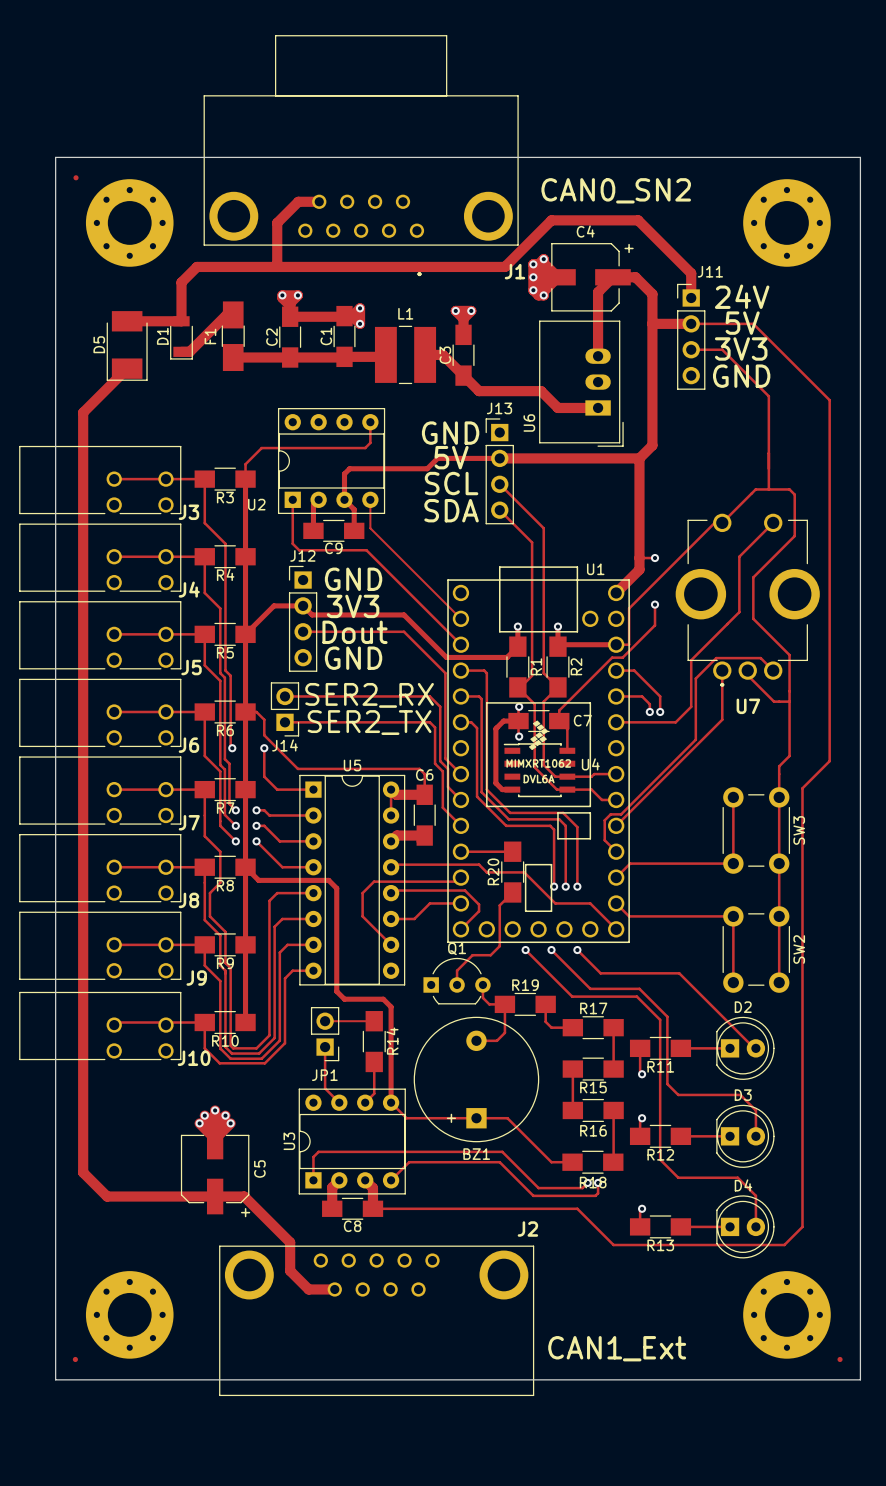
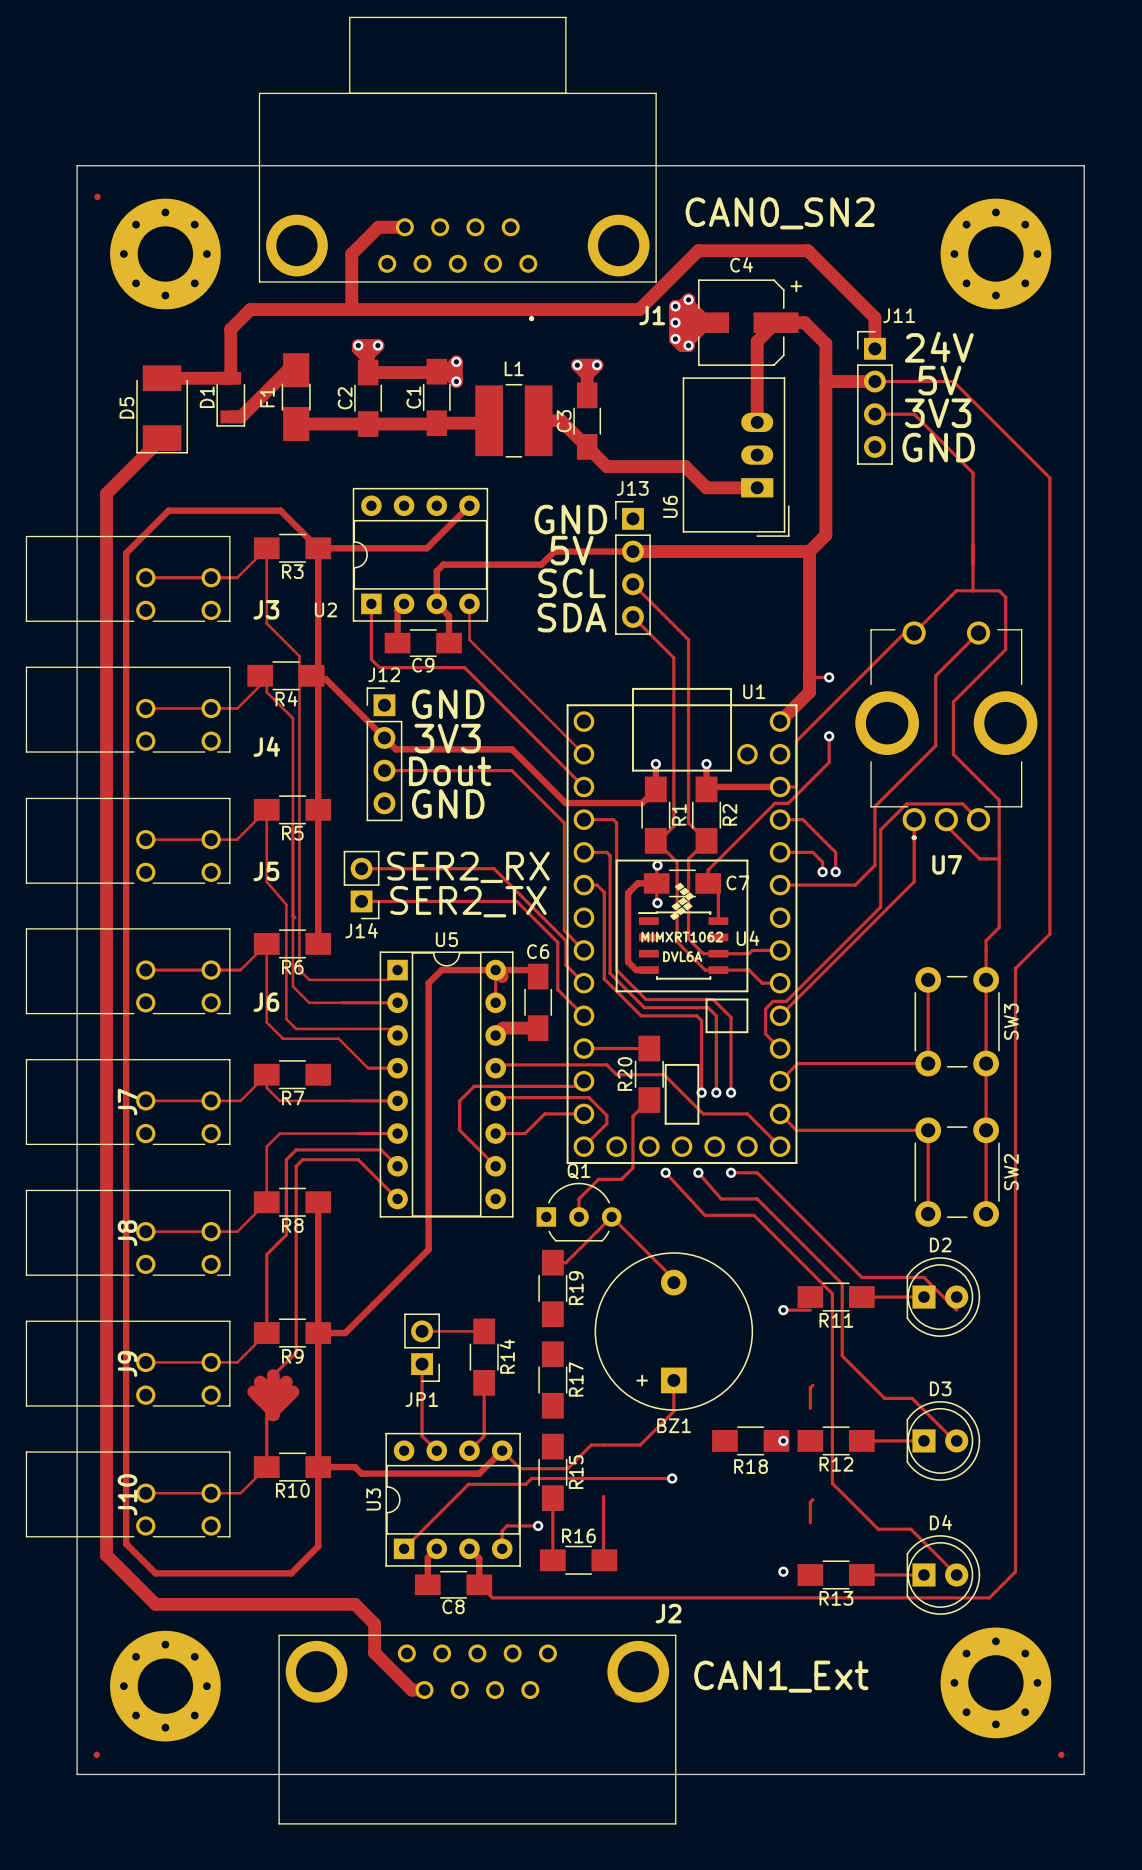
board edge: (55, 157) (55, 1379) (860, 1379) (860, 157) (55, 157) -> (77, 165) (77, 1774) (1084, 1774) (1084, 165) (77, 165)
track: (370, 422) (370, 442) (365, 448) (261, 448) (245, 464) (245, 1022) -> (469, 505) (426, 548) (318, 548)
track: none -> (318, 548) (318, 943)
track: none -> (318, 548) (280, 510) (168, 510) (126, 553) (126, 1543) (155, 1573) (291, 1573) (318, 1546) (318, 1202)
track: (186, 479) (204, 479) (204, 523) (225, 543) (225, 670) (230, 675) -> (145, 708) (237, 708) (266, 679) (266, 692) (292, 718) (292, 826)
R3 position: (225, 479) -> (292, 548)
J3 name position: J3 (188, 512) -> J3 (266, 609)
track: (114, 556) (204, 556) (204, 592) (220, 608) (220, 673) (224, 677) (224, 759) (229, 763) (229, 803) (235, 810) -> none
J4 position: (100, 557) -> (128, 709)
J4 name position: J4 (189, 589) -> J4 (266, 746)
track: (303, 605) (273, 605) (245, 634) -> (384, 737) (325, 679) (318, 679) (318, 548)
track: (114, 634) (204, 634) (204, 665) (220, 680) (220, 765) (224, 769) (224, 814) (235, 825) -> none
R5 position: (225, 634) -> (292, 809)
J5 position: (100, 635) -> (128, 840)
J5 name position: J5 (191, 667) -> J5 (266, 871)
text position: SER2_RX (369, 695) -> SER2_RX (468, 867)
track: (284, 696) (429, 696) (440, 706) (440, 761) (448, 768) (448, 787) -> (361, 868) (493, 868) (565, 940) (565, 965) (567, 966)
J14 position: (284, 709) -> (361, 885)
track: (114, 711) (204, 711) (204, 755) (220, 771) (220, 825) (235, 841) -> none
R6 position: (225, 711) -> (292, 943)
track: (245, 711) (256, 711) (264, 719) (264, 735) (297, 768) (419, 768) (424, 774) (424, 794) (396, 794) -> none
J6: (100, 712) -> none
track: (284, 722) (429, 722) (435, 727) (435, 763) (442, 771) (442, 807) -> (361, 901) (516, 901) (557, 942) (557, 989) (561, 992)
text position: SER2_TX (369, 722) -> SER2_TX (468, 901)
via: (232, 748) -> none
track: (264, 748) (264, 776) (277, 789) (313, 789) -> (237, 577) (266, 548) (266, 623) (299, 656) (299, 970) (309, 979) (387, 979) (397, 970)
via: (264, 748) -> none
track: (189, 789) (204, 789) (204, 836) (220, 851) (220, 882) (209, 893) (209, 916) (225, 931) (225, 939) -> none
R7 position: (225, 789) -> (292, 1074)
track: none -> (531, 970) (441, 970) (428, 983) (428, 1249) (345, 1333) (318, 1333)
via: (235, 810) -> none
track: (256, 810) (264, 810) (269, 815) -> (292, 915) (292, 986) (309, 1002) (341, 1002)
via: (256, 810) -> none
J7 name: J7 (189, 822) -> J6 (266, 1002)
via: (235, 825) -> none
track: (256, 825) (264, 825) (279, 841) (313, 841) -> (145, 839) (236, 839) (266, 809) (266, 881) (286, 904) (286, 1019) (296, 1028) (391, 1028) (397, 1035)
via: (256, 825) -> none
via: (235, 841) -> none
track: (256, 841) (282, 867) (290, 867) -> (240, 970) (266, 943) (266, 1022) (283, 1038) (338, 1038) (368, 1068)
via: (256, 841) -> none
track: (114, 867) (204, 867) (204, 920) (220, 935) (220, 965) (225, 970) -> none
R8 position: (225, 867) -> (292, 1202)
J8 position: (100, 868) -> (128, 1232)
track: (256, 878) (258, 880) (328, 880) (336, 888) (336, 991) (344, 999) (383, 999) (391, 1006) (391, 1102) (406, 1118) (507, 1118) (551, 1162) (572, 1162) -> none
track: none -> (145, 1100) (240, 1100) (266, 1074) (266, 1087) (279, 1100) (351, 1100)
track: (277, 893) (269, 900) (269, 1035) (256, 1048) (233, 1048) (230, 1045) (230, 968) (225, 962) -> (286, 1198) (286, 1189)
J7: none -> (128, 1102)
J8 name rotation: 0° (188, 900) -> 90° counterclockwise (127, 1233)
J8 name position: J8 (188, 900) -> J8 (127, 1233)
track: (282, 918) (274, 926) (274, 1038) (259, 1053) (231, 1053) (225, 1047) (225, 999) -> (358, 1133) (279, 1133) (266, 1146) (266, 1202) (237, 1231) (145, 1231)
track: (114, 944) (204, 944) (204, 965) (220, 981) (220, 1048) (230, 1058) (261, 1058) (279, 1040) (279, 952) (287, 944) (313, 944) -> (286, 1159) (296, 1149) (381, 1149) (397, 1166)
R9 position: (225, 944) -> (292, 1333)
J9 position: (100, 945) -> (128, 1363)
track: (525, 950) (572, 996) (636, 996) (660, 1019) (660, 1159) (678, 1177) (737, 1177) (755, 1195) (755, 1226) -> (665, 1172) (704, 1215) (753, 1215) (832, 1293) (832, 1483) (878, 1529) (910, 1529) (956, 1574)
track: (551, 950) (590, 988) (639, 988) (667, 1016) (667, 1084) (678, 1094) (740, 1094) (755, 1110) (755, 1136) -> none
track: (577, 950) (598, 970) -> (698, 1172) (721, 1198) (757, 1198)
track: none -> (731, 1172) (757, 1172) (861, 1277) (923, 1277) (956, 1310)
track: (313, 970) (292, 970) (284, 978) (284, 1043) (264, 1063) (219, 1063) (204, 1048) (204, 1022) (114, 1022) -> (397, 1198) (358, 1159) (302, 1159) (296, 1166) (296, 1352) (266, 1382) (266, 1467) (240, 1493) (145, 1493)
track: (600, 973) (679, 973) (755, 1048) -> (760, 1202) (842, 1283) (842, 1355) (884, 1398) (912, 1398) (956, 1440)
J9 name rotation: 0° (196, 978) -> 90° counterclockwise (127, 1364)
J9 name position: J9 (196, 978) -> J9 (127, 1364)
track: (482, 984) (482, 997) (489, 1004) (504, 1004) (504, 1032) (496, 1040) (476, 1040) -> none
track: none -> (286, 1234) (266, 1254) (266, 1333) (237, 1362) (145, 1362)
R19 rotation: 0° (525, 1004) -> 90° clockwise (552, 1288)
R19 position: (525, 1004) -> (552, 1288)
track: (545, 1004) (545, 1021) (551, 1027) (572, 1027) -> none
track: (325, 1021) (374, 1021) -> (422, 1331) (484, 1331)
track: none -> (552, 1262) (565, 1262) (611, 1216) (673, 1279) (673, 1282)
R10 position: (225, 1022) -> (292, 1467)
J10 position: (100, 1026) -> (128, 1494)
R17 rotation: 0° (593, 1027) -> 90° clockwise (552, 1380)
R17 position: (593, 1027) -> (552, 1380)
track: (613, 1027) (613, 1069) -> none
JP1 position: (325, 1034) -> (422, 1347)
R14 position: (374, 1041) -> (484, 1357)
track: (325, 1047) (325, 1088) (339, 1102) -> none
track: (640, 1048) (640, 1072) (642, 1074) -> none
J10 name rotation: 0° (194, 1058) -> 90° counterclockwise (127, 1494)
J10 name position: J10 (194, 1058) -> J10 (127, 1494)
track: none -> (783, 1310) (810, 1310)
track: (374, 1061) (374, 1093) (365, 1102) -> none
track: (572, 1069) (572, 1110) -> none
R15 rotation: 0° (593, 1069) -> 90° clockwise (552, 1472)
R15 position: (593, 1069) -> (552, 1472)
via position: (642, 1074) -> (783, 1310)
BZ1 position: (476, 1079) -> (673, 1331)
R15 name position: R15 (593, 1087) -> R15 (576, 1472)
track: none -> (422, 1364) (422, 1436) (436, 1450)
via: (215, 1110) -> none
R16 position: (593, 1110) -> (578, 1560)
track: (613, 1110) (613, 1162) -> none
track: none -> (673, 1380) (673, 1411) (640, 1445) (591, 1445) (567, 1468) (520, 1468) (502, 1450) (479, 1473) (361, 1473) (355, 1467) (318, 1467)
via: (204, 1115) -> none
via: (225, 1115) -> none
track: none -> (484, 1382) (484, 1436) (469, 1450)
via: (642, 1118) -> none
via: (199, 1123) -> none
via: (230, 1123) -> none
R16 name position: R16 (593, 1130) -> R16 (578, 1535)
R12 position: (660, 1136) -> (836, 1440)
track: (680, 1136) (730, 1136) -> (861, 1440) (923, 1440)
D3 position: (745, 1136) -> (943, 1440)
U3 position: (352, 1141) -> (453, 1499)
via: none -> (783, 1440)
C5: (215, 1169) -> none
track: (83, 1172) (107, 1196) (244, 1196) (290, 1242) (290, 1270) (308, 1289) (334, 1289) -> (106, 1454) (106, 1555) (155, 1604) (355, 1604) (374, 1624) (374, 1652) (411, 1690) (424, 1690)
track: (313, 1180) (313, 1157) (318, 1151) (502, 1151) (538, 1188) (582, 1188) (587, 1182) -> none
track: (339, 1180) (332, 1187) (332, 1208) -> (436, 1548) (427, 1557) (427, 1584)
track: (365, 1180) (372, 1188) (372, 1208) (577, 1208) (613, 1245) (784, 1245) (802, 1226) -> (469, 1548) (479, 1558) (479, 1584) (492, 1597) (989, 1597) (1015, 1571) (1015, 1522)
track: (391, 1180) (409, 1162) (499, 1162) (533, 1195) (595, 1195) (598, 1193) (598, 1182) -> none
via: (587, 1182) -> none
via: (598, 1182) -> none
track: none -> (672, 1478) (531, 1478) (525, 1484) (468, 1484) (404, 1548)
via: none -> (672, 1478)
track: none -> (603, 1496) (604, 1560)
track: none -> (552, 1498) (552, 1560)
C8 position: (352, 1208) -> (453, 1584)
via: (642, 1208) -> none
R13 position: (660, 1226) -> (836, 1574)
track: (680, 1226) (730, 1226) -> (861, 1574) (923, 1574)
D4 position: (745, 1226) -> (943, 1574)
track: none -> (538, 1525) (507, 1525) (502, 1530) (502, 1548)
via: none -> (538, 1525)
via: none -> (783, 1571)
part position: (129, 1314) -> (165, 1686)
part position: (786, 1314) -> (995, 1682)
J2 position: (376, 1320) -> (477, 1729)
part position: (75, 1359) -> (96, 1754)
part position: (840, 1359) -> (1061, 1754)

